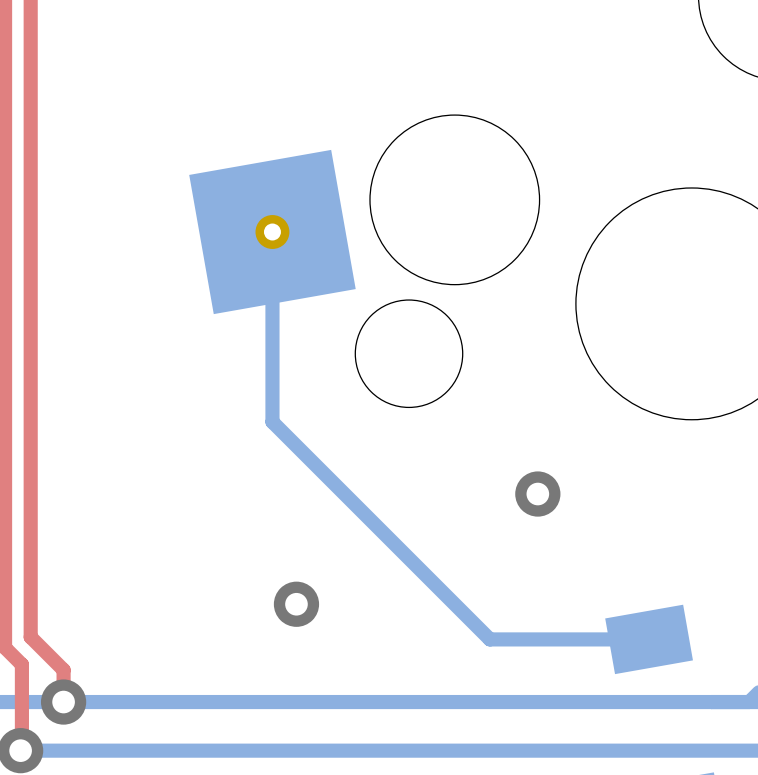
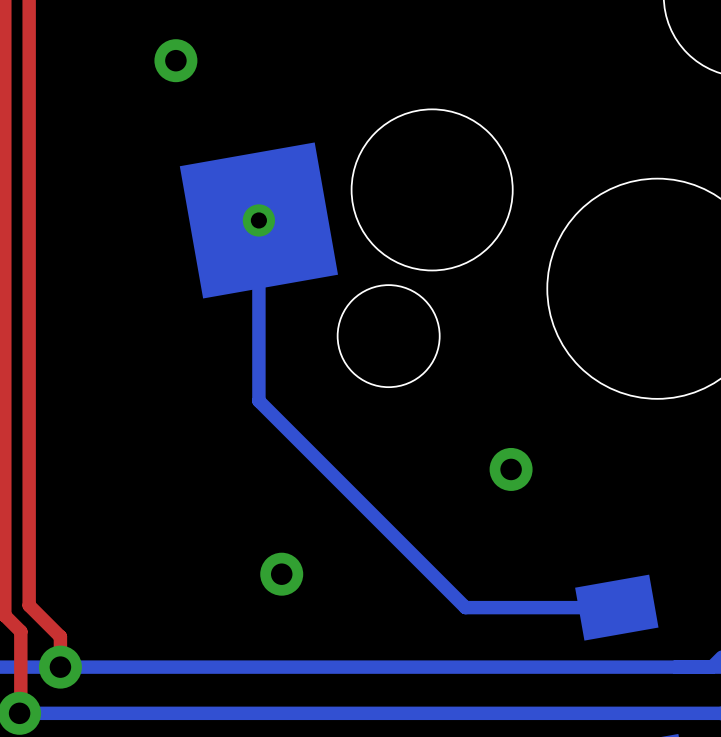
via: none -> (175, 60)

